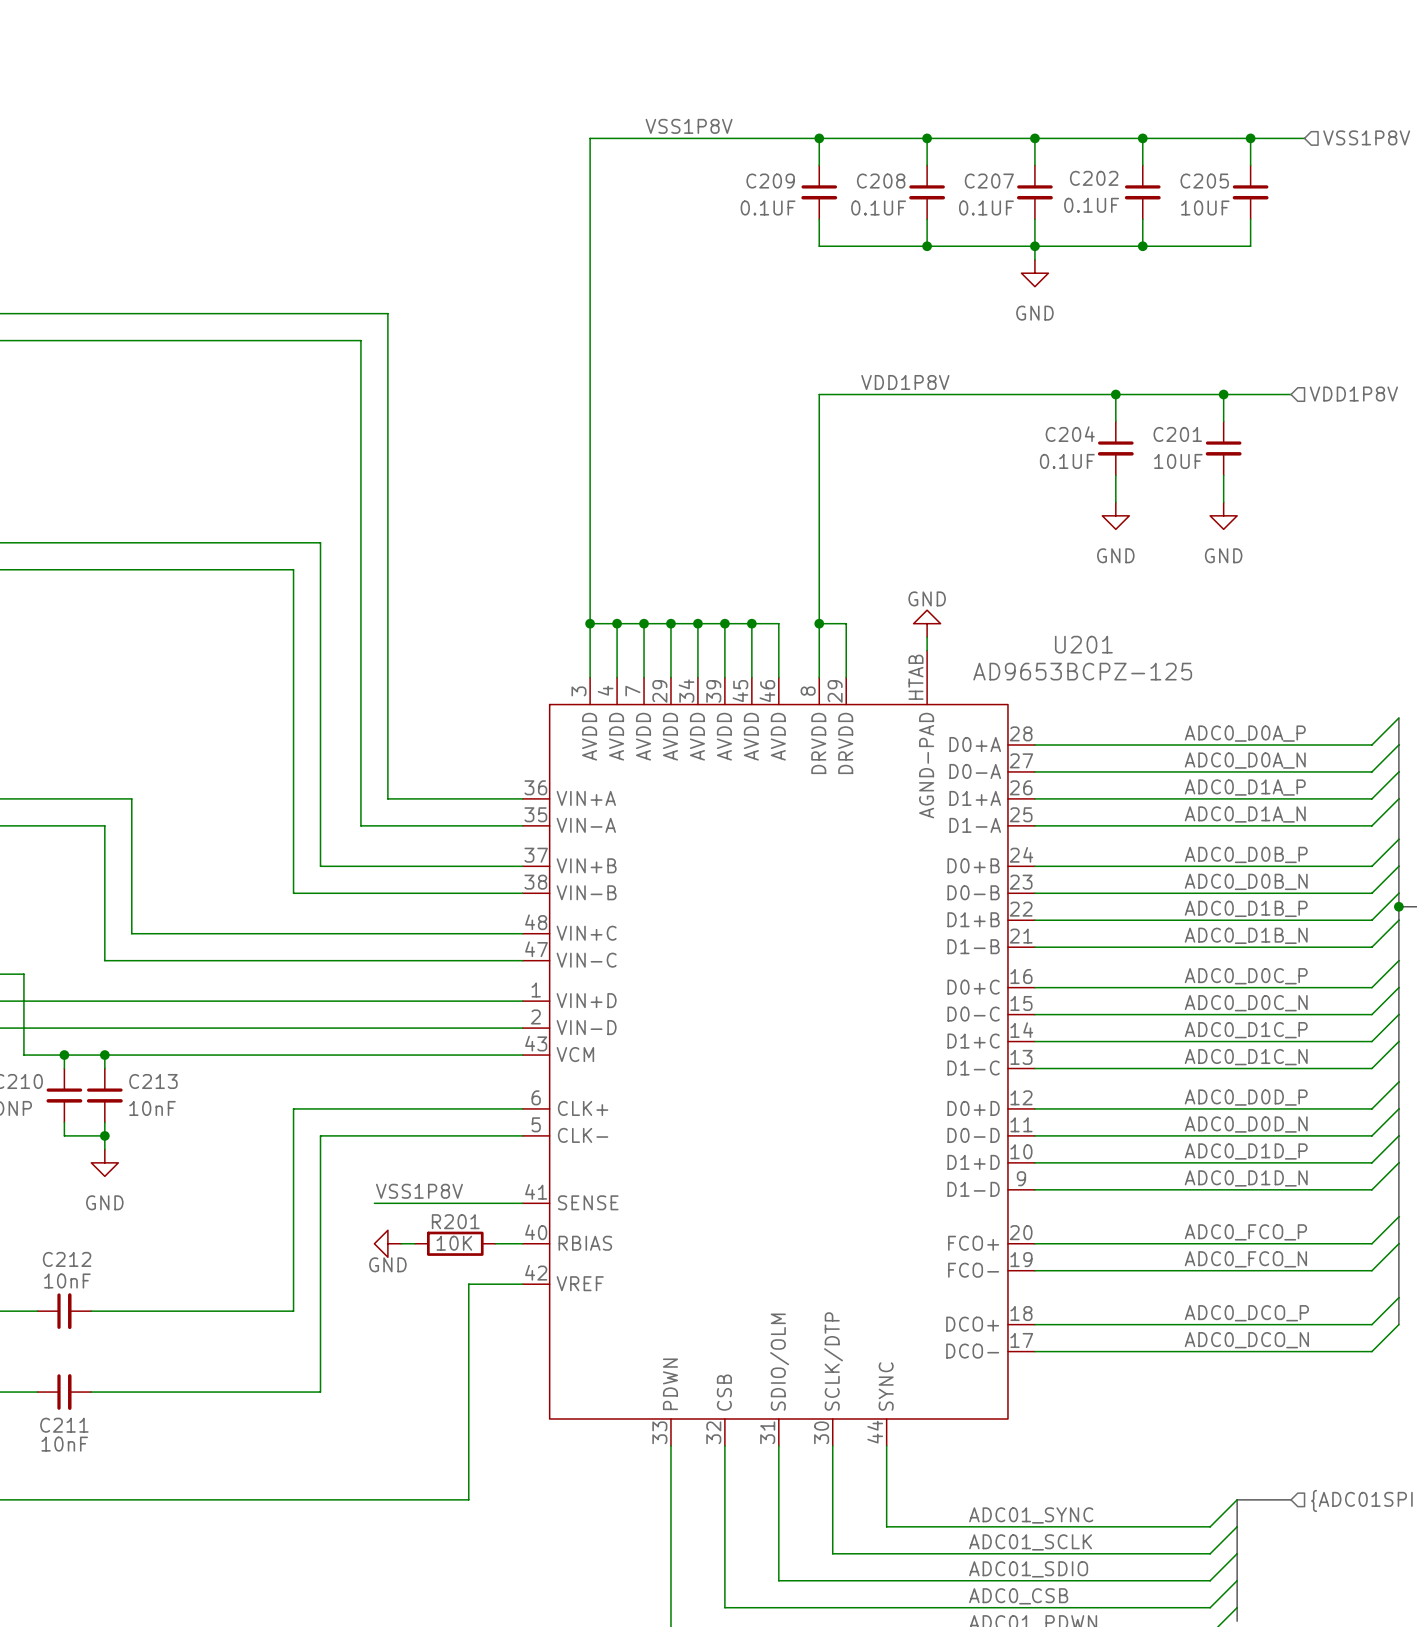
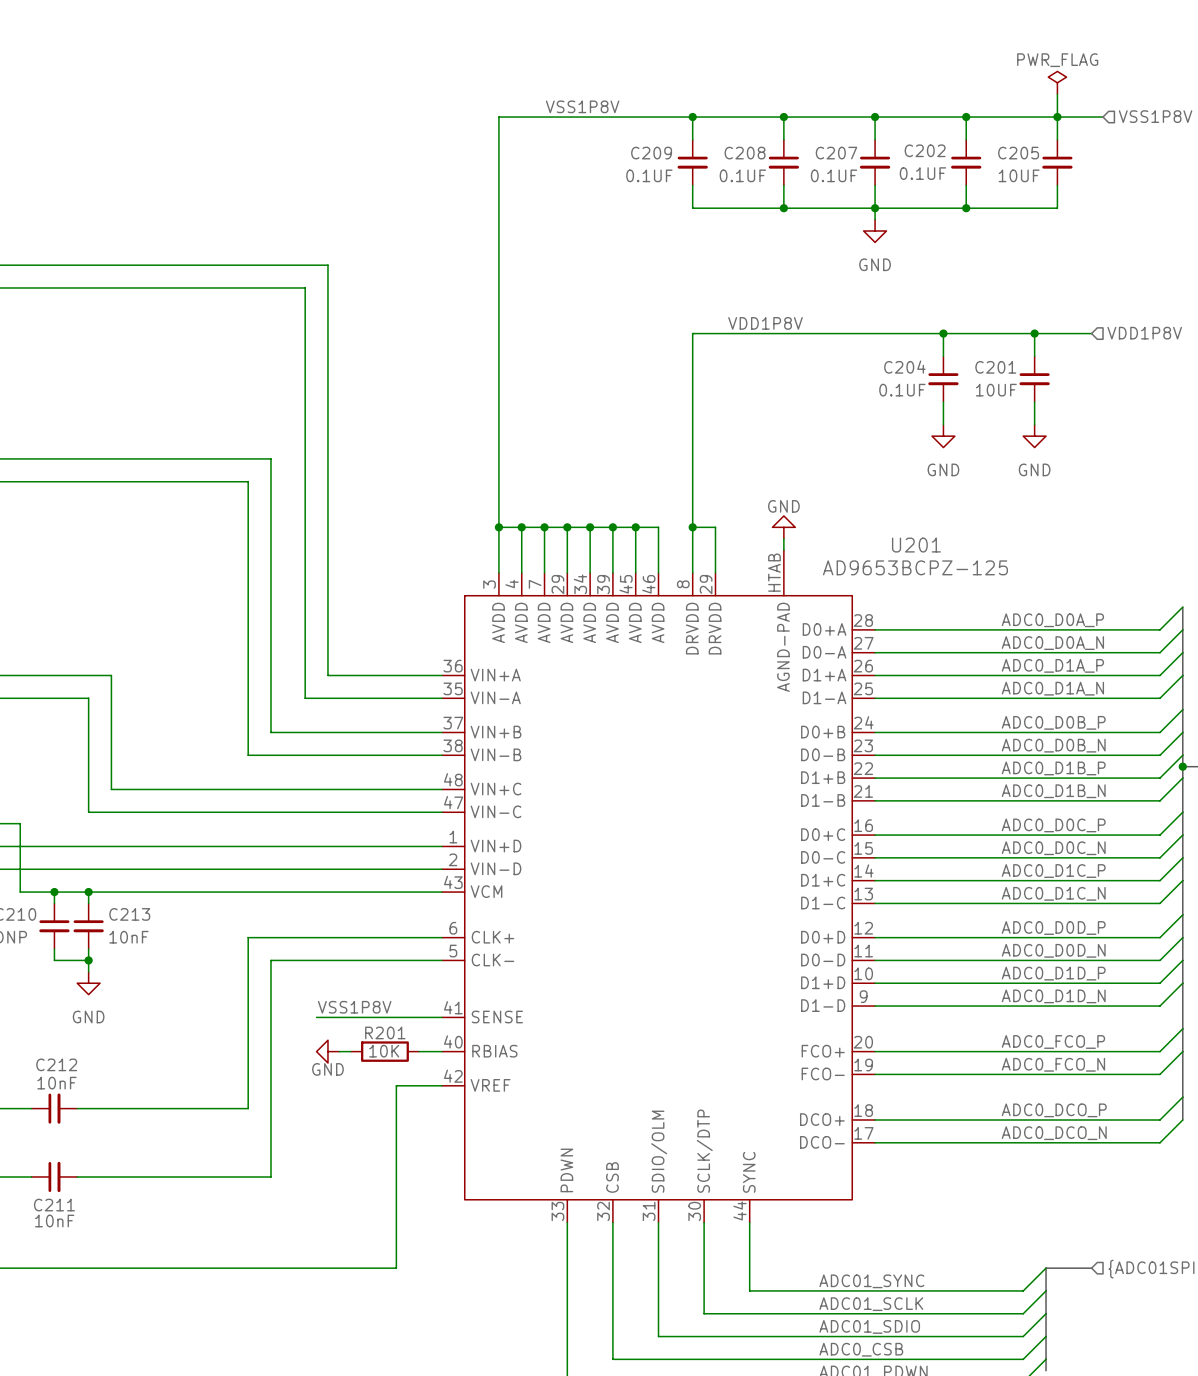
power symbol: none -> PWR_FLAG (1057, 82)
wire: none -> (1057, 94) (1057, 117)

